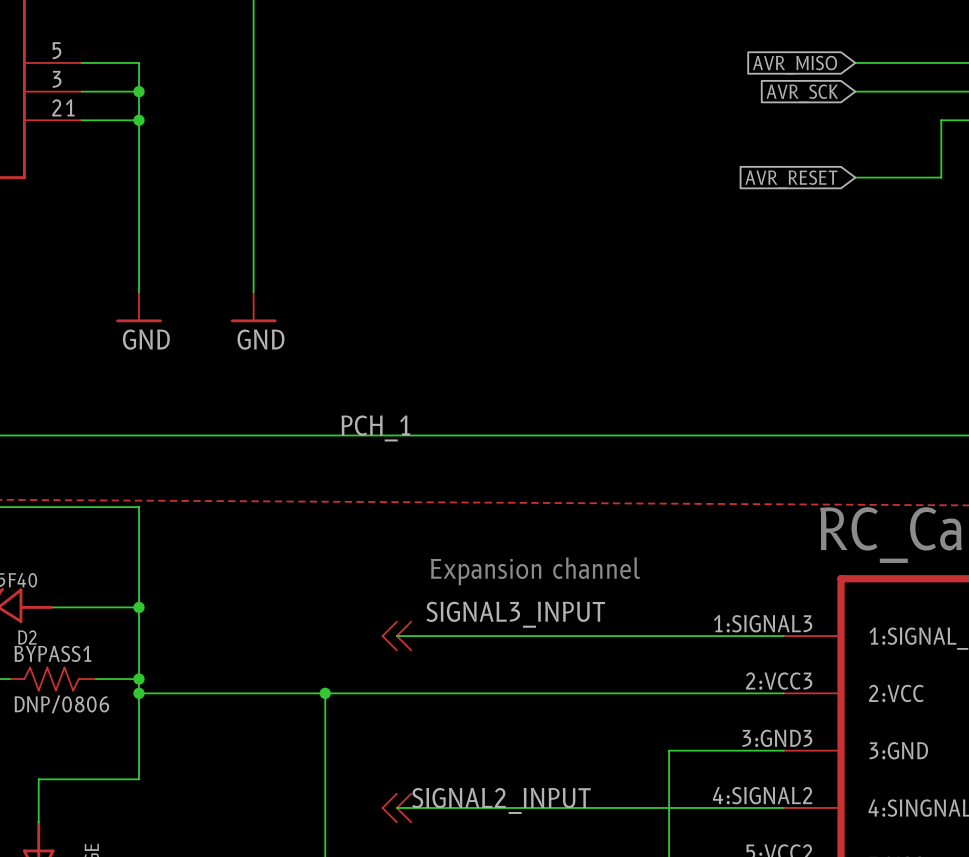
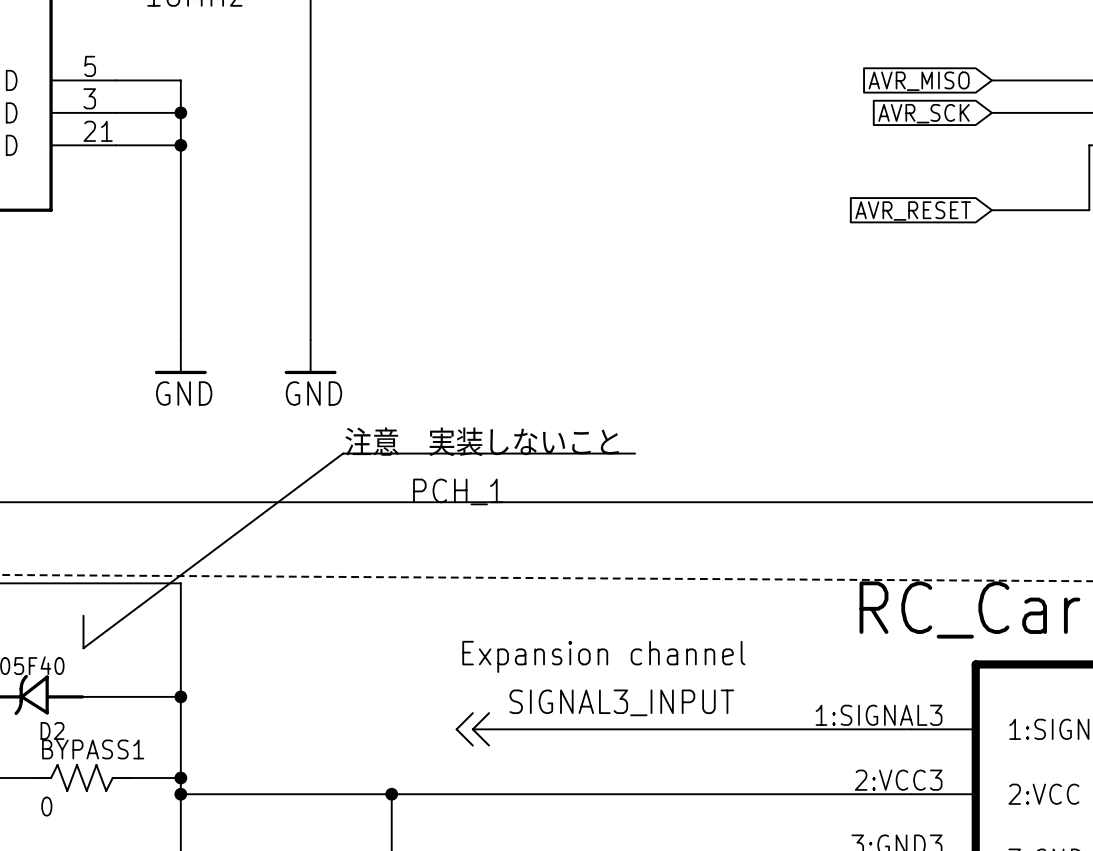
text: none -> 注意 実装しないこと (482, 441)
line: none -> (635, 453) (343, 453) (83, 648) (83, 615)
BYPASS1 value: DNP/0806 (61, 704) -> 0 (46, 806)

